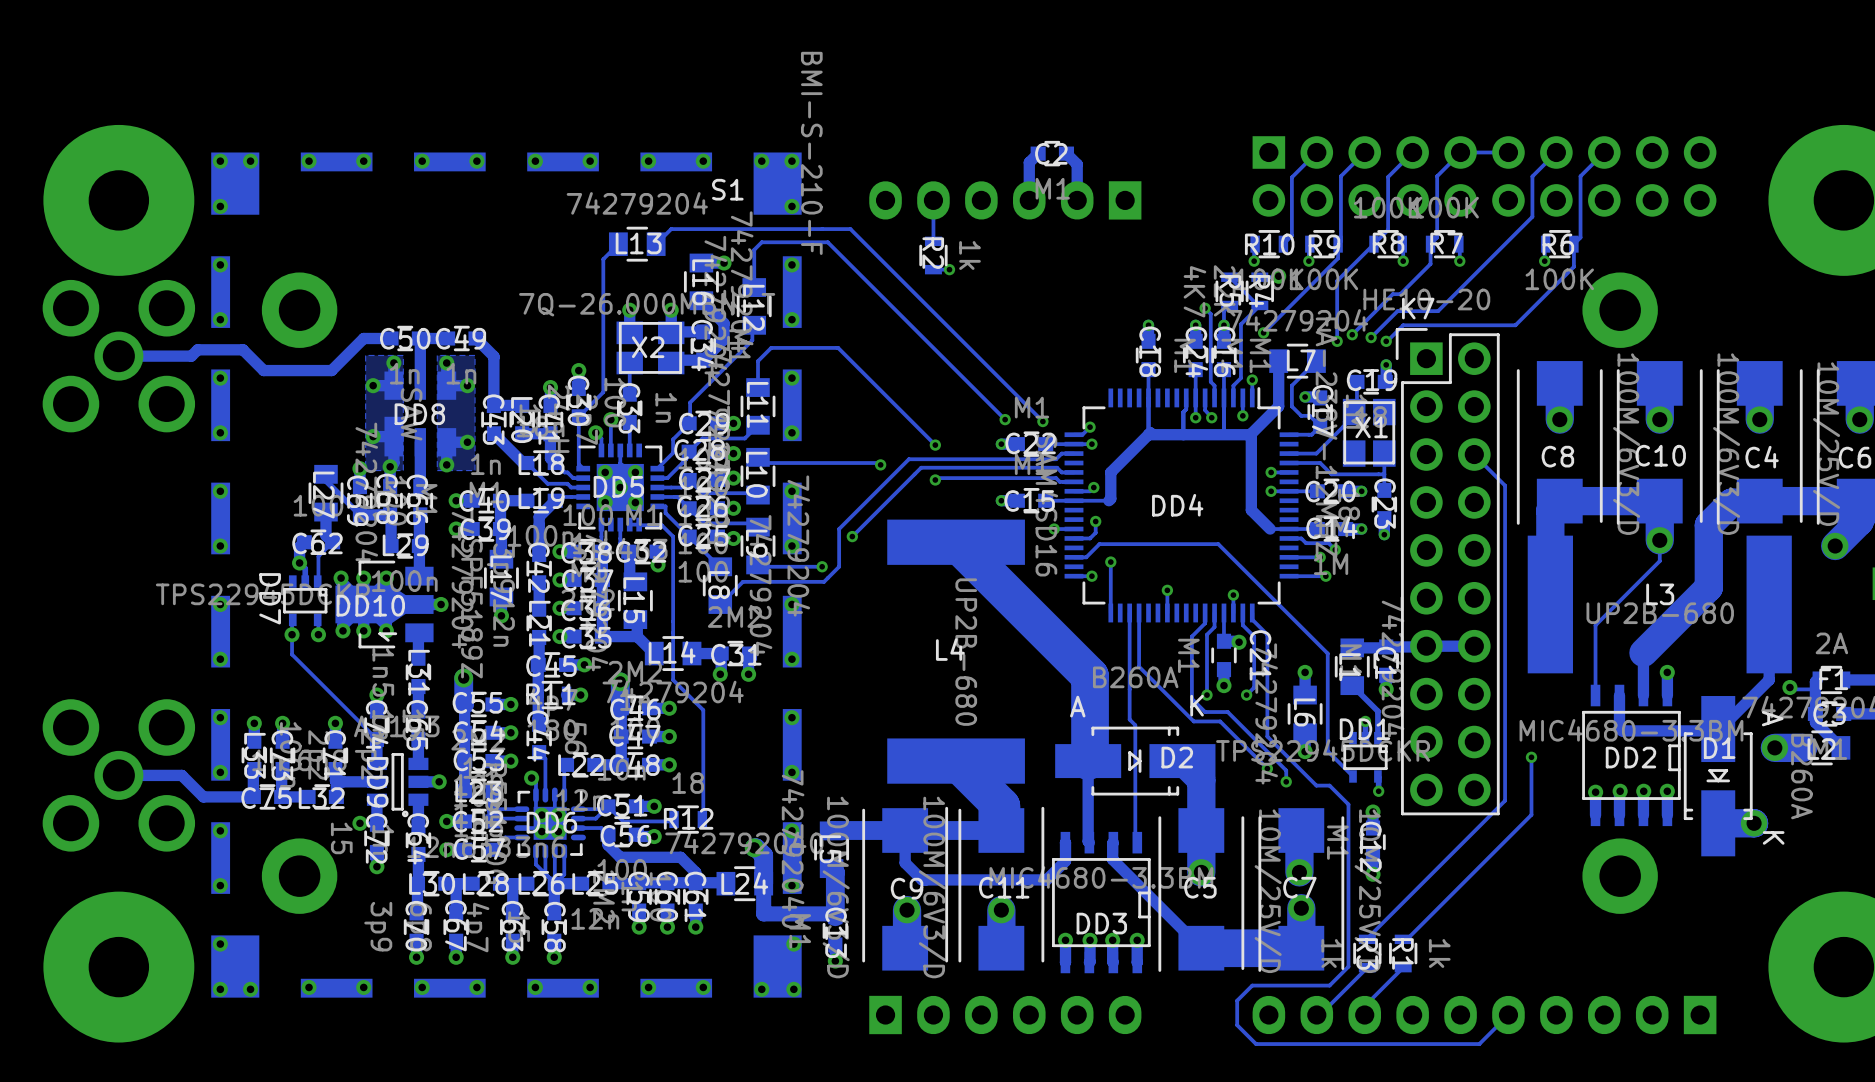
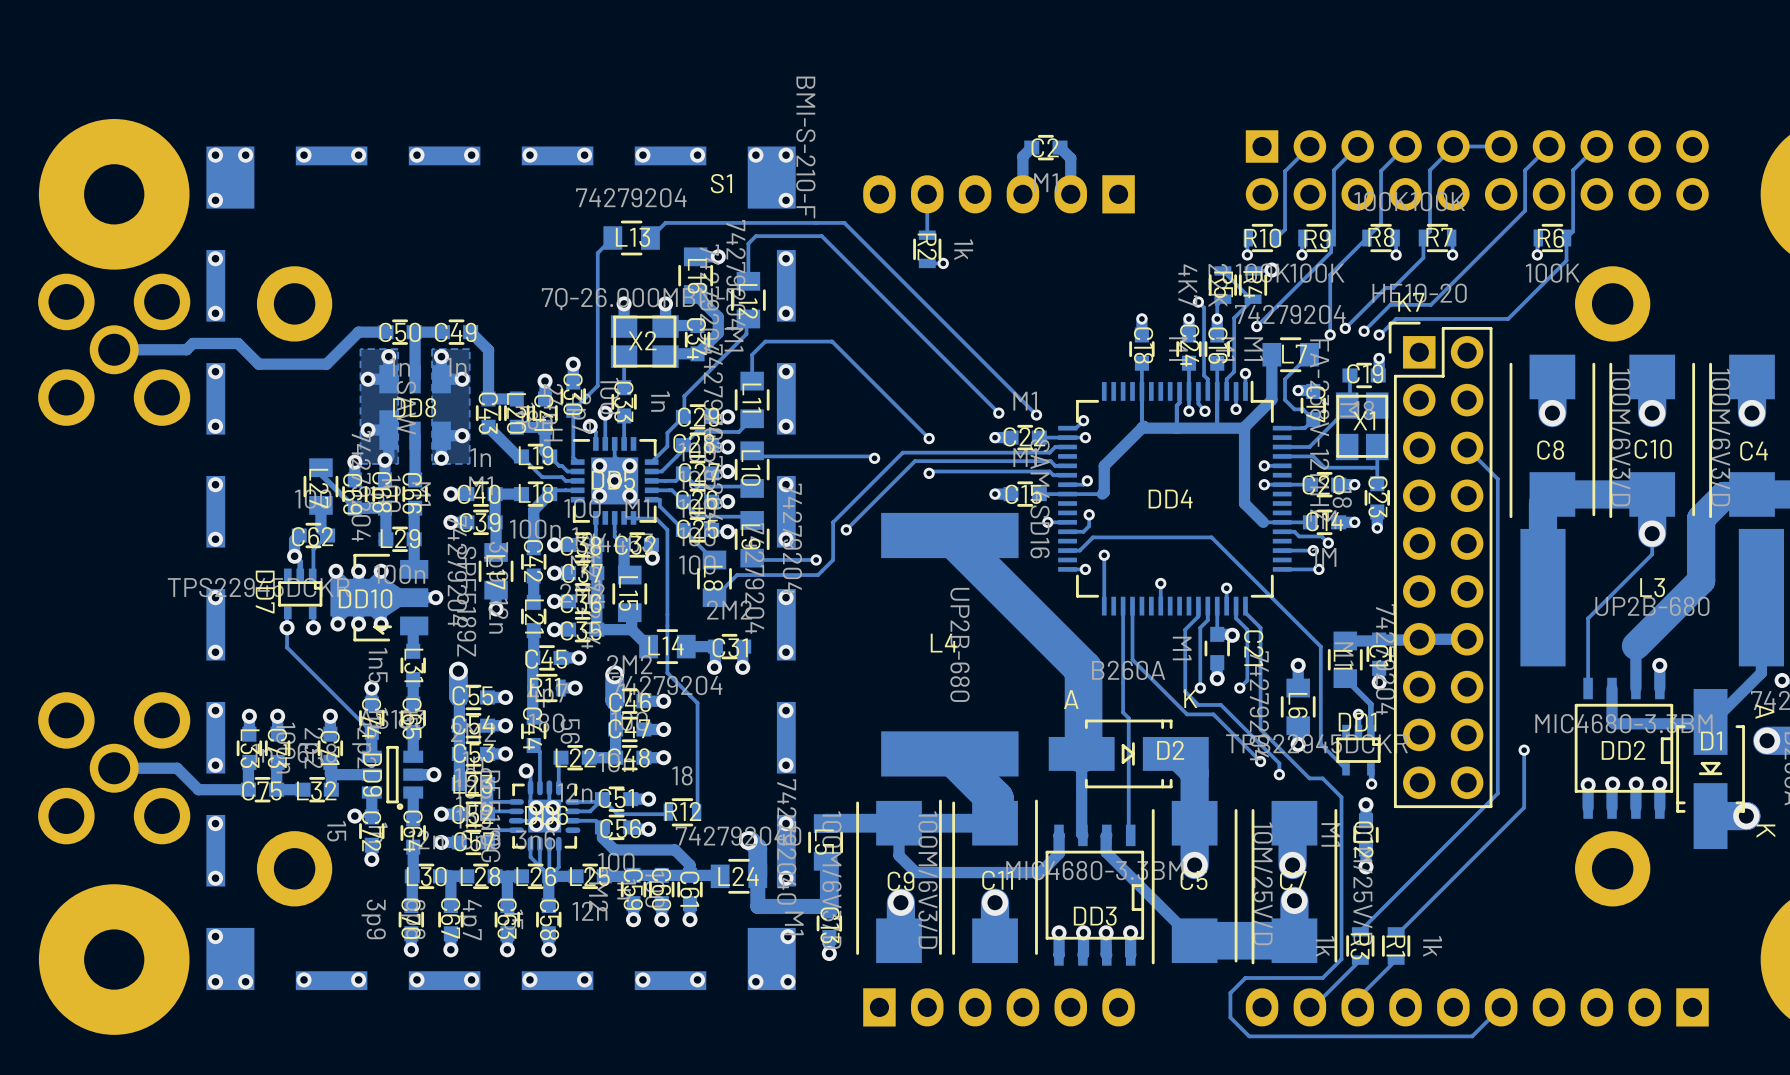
L18 name position: L18 (541, 464) -> L18 (536, 493)
L19 name position: L19 (541, 498) -> L19 (536, 455)

